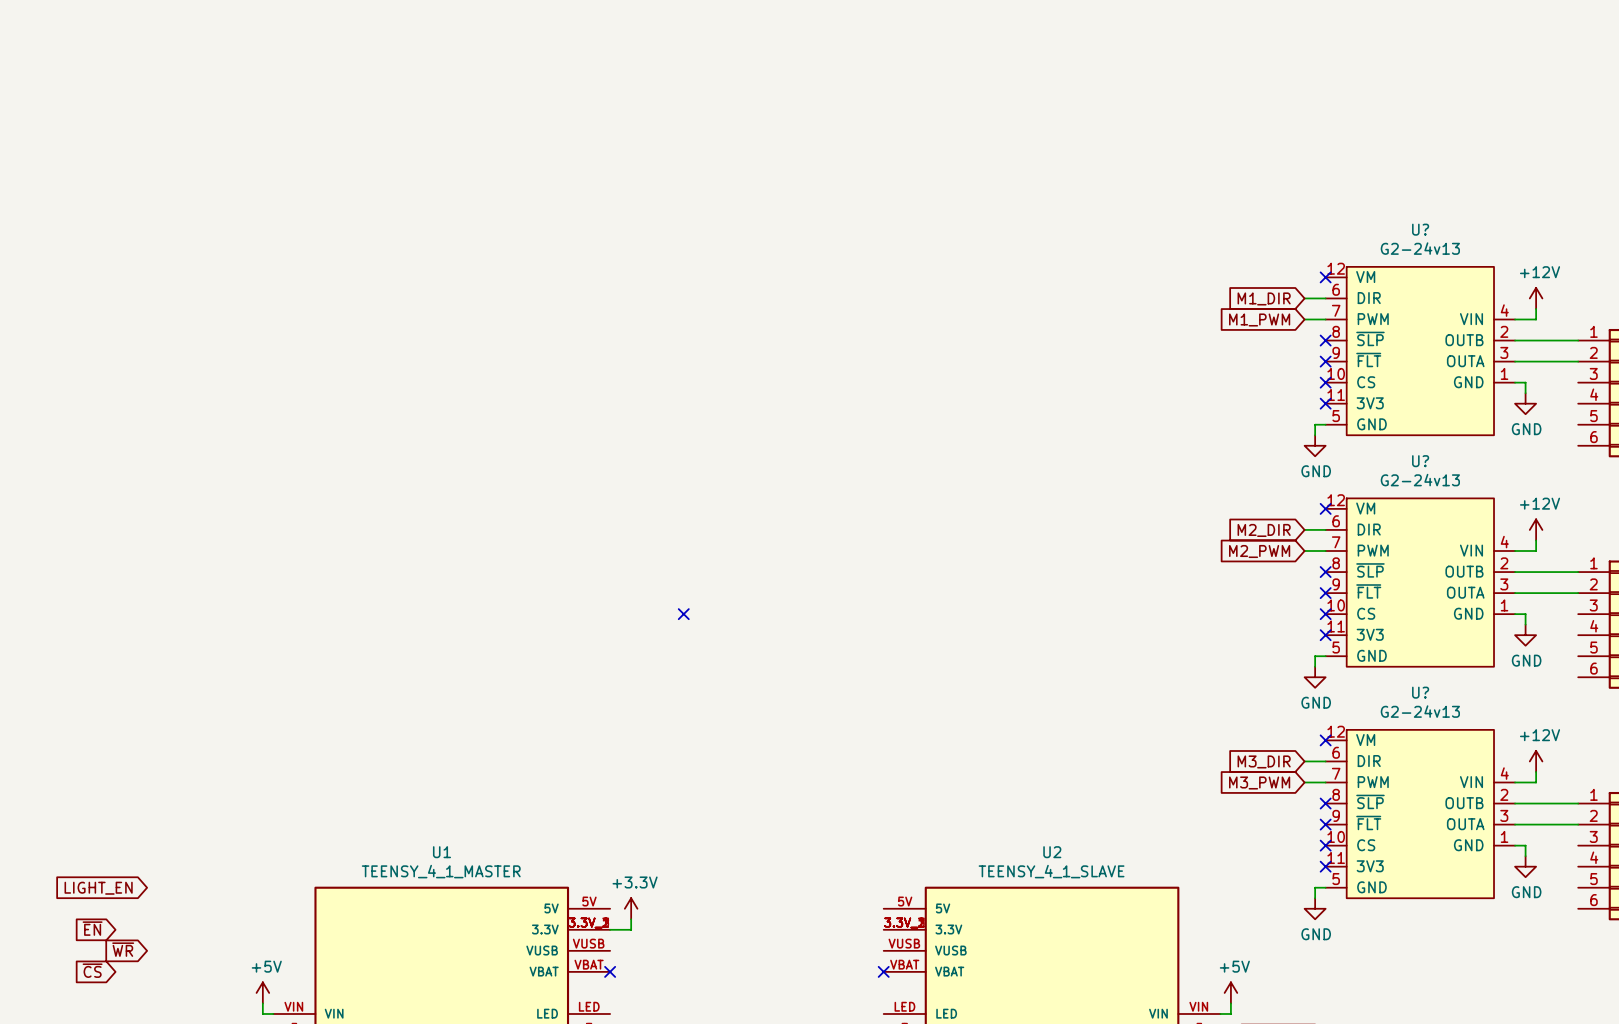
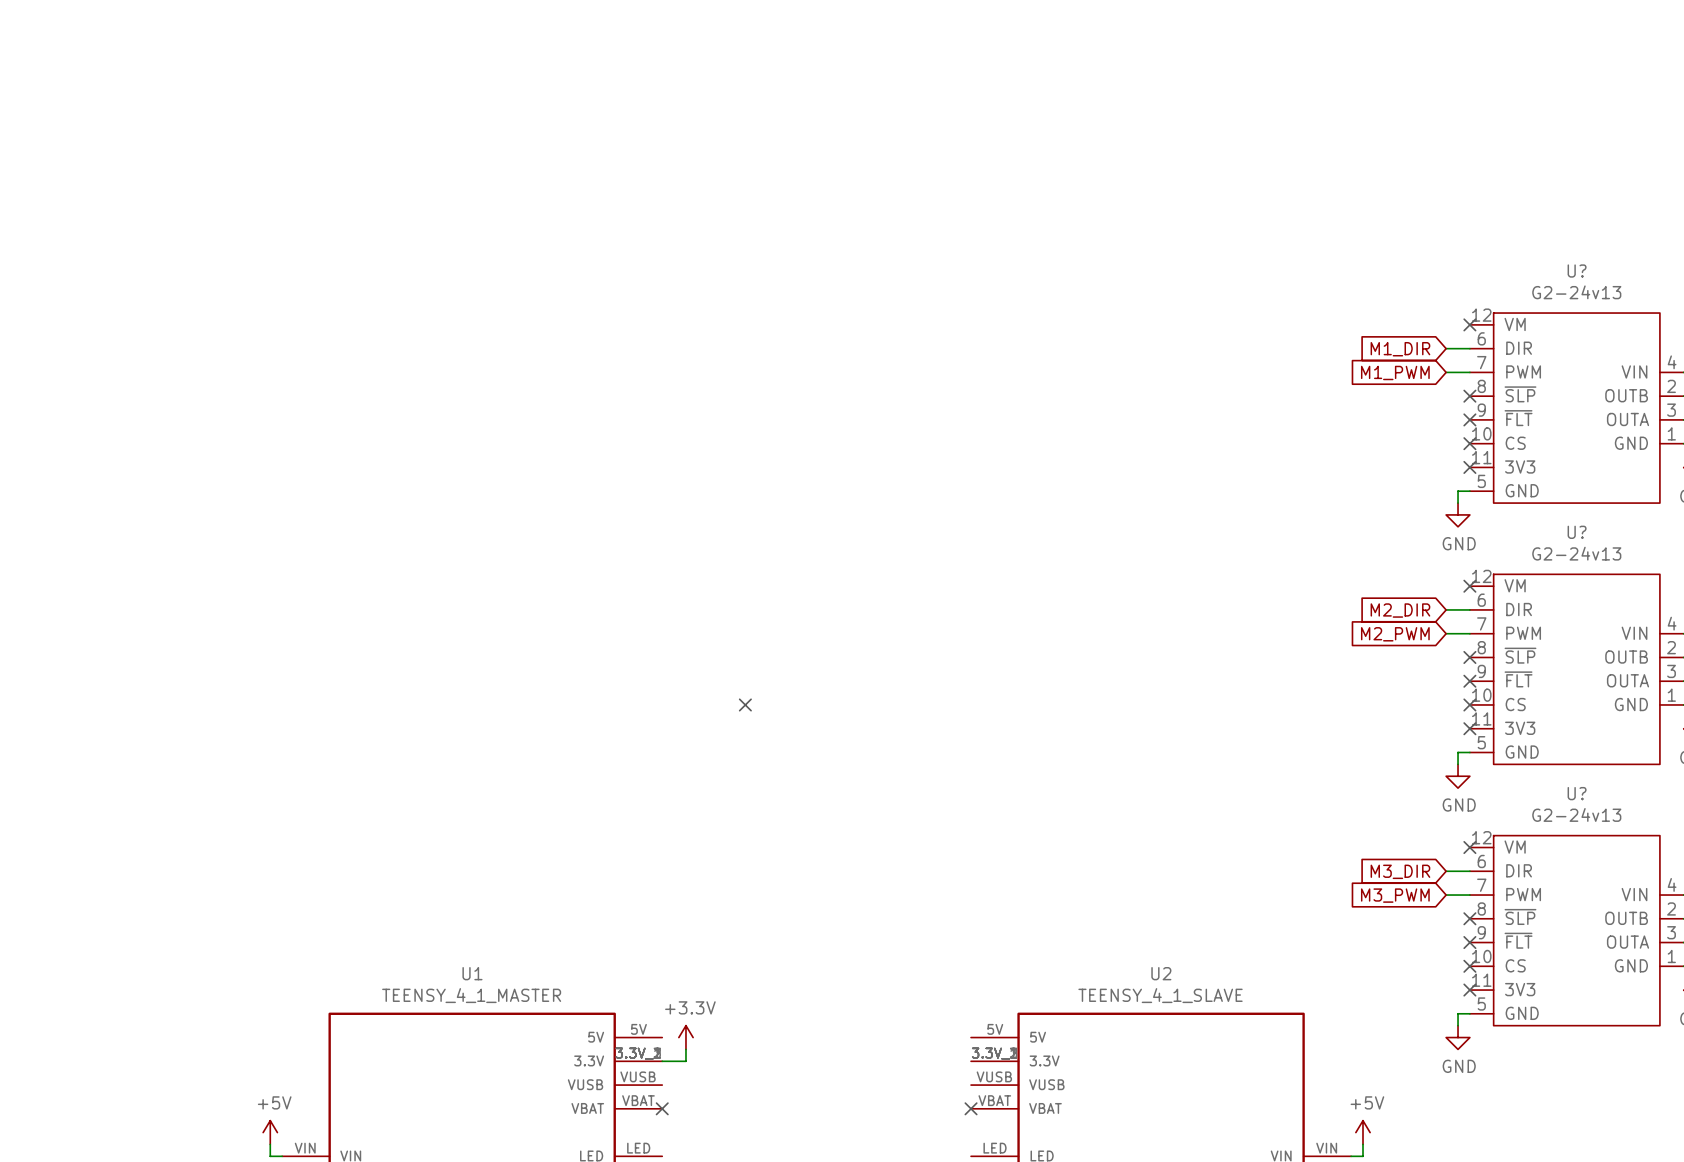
global label: LIGHT_EN (98, 888) -> none
global label: ~{EN} (92, 928) -> none
global label: ~{WR} (123, 949) -> none
global label: ~{CS} (92, 970) -> none

